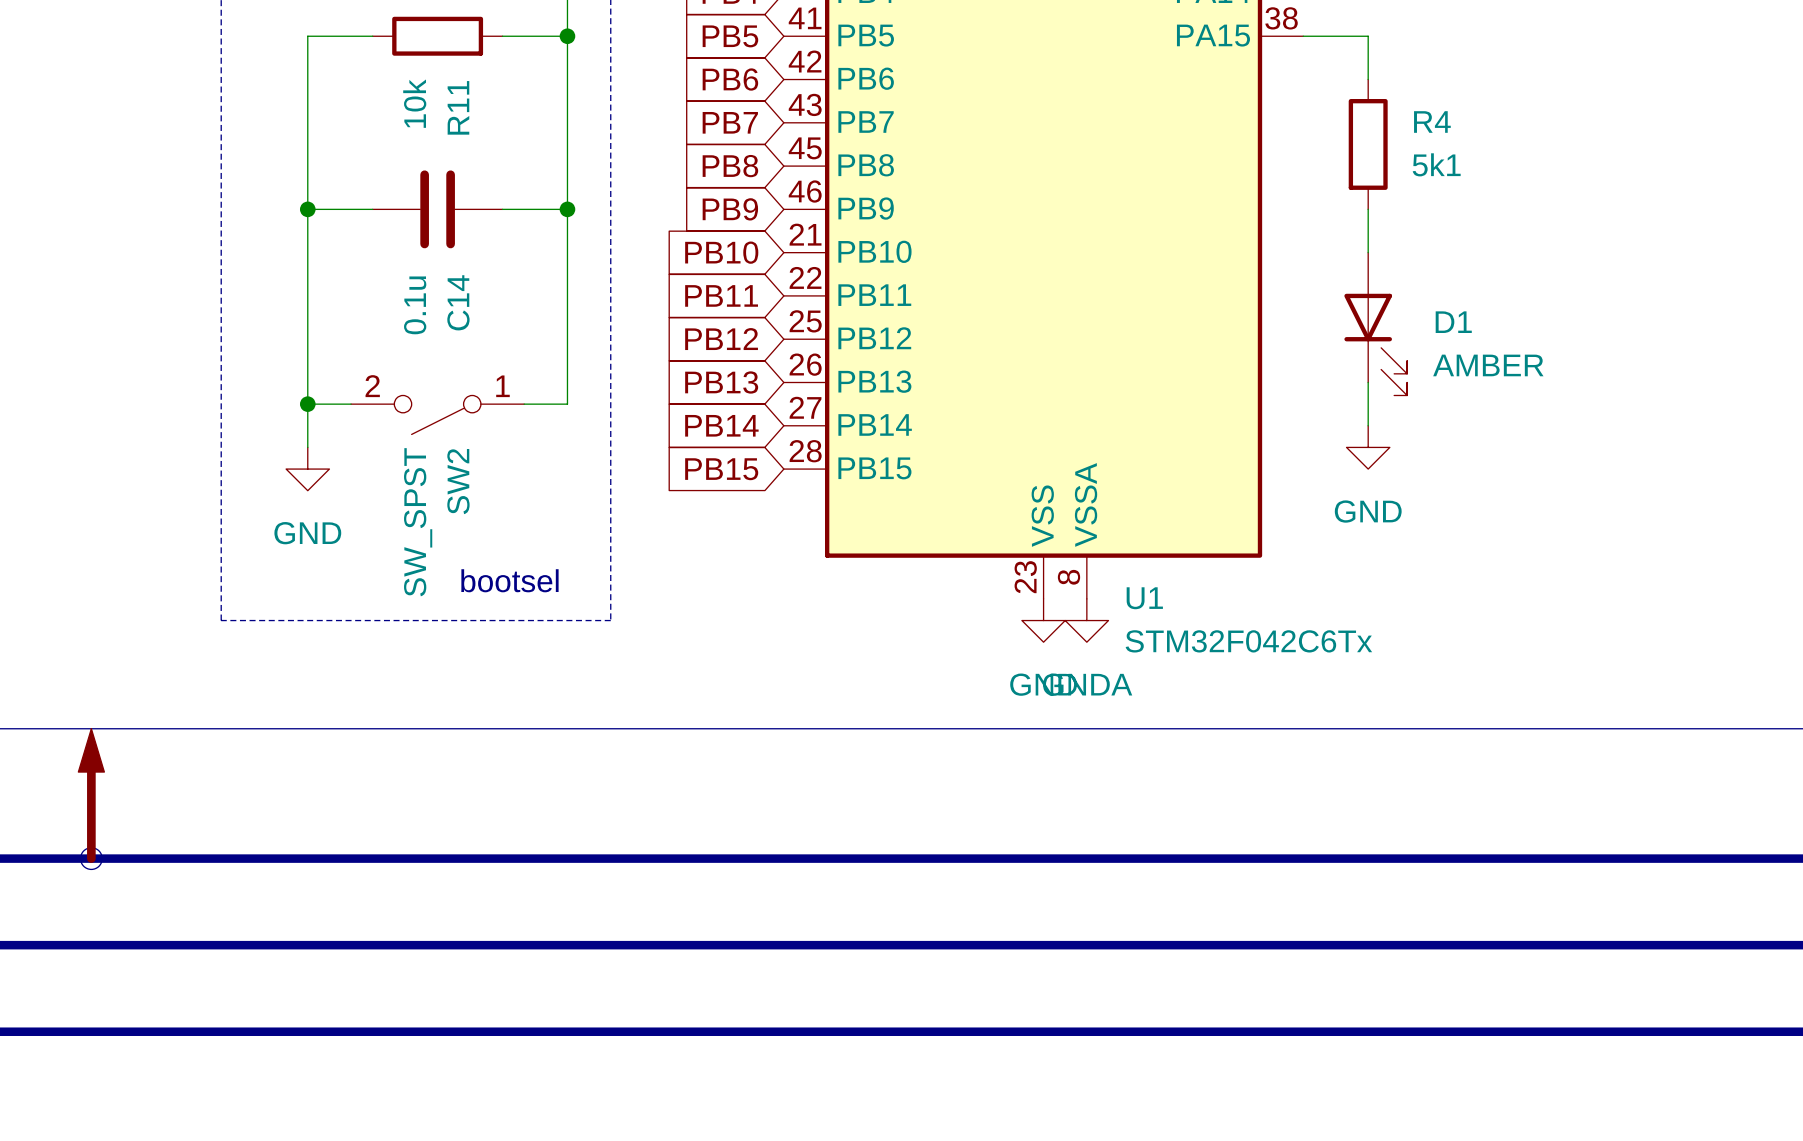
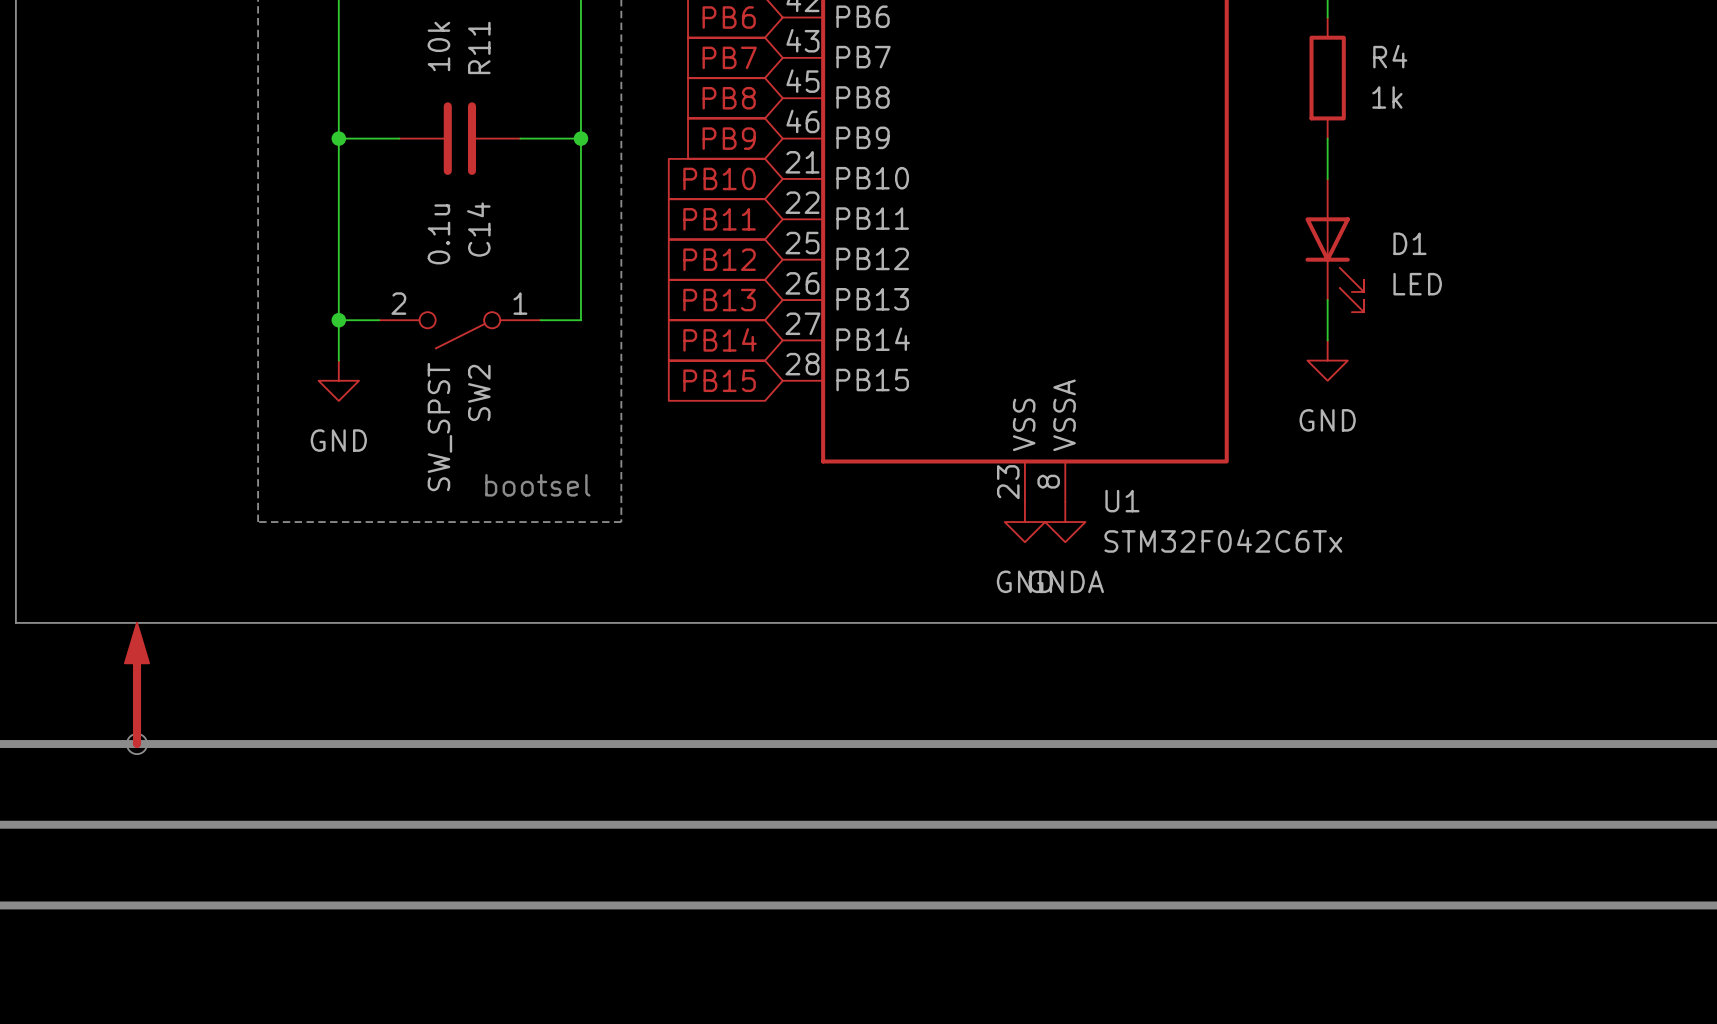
R4 value: 5k1 (1436, 164) -> 1k (1387, 97)
D1 value: AMBER (1488, 365) -> LED (1417, 284)

